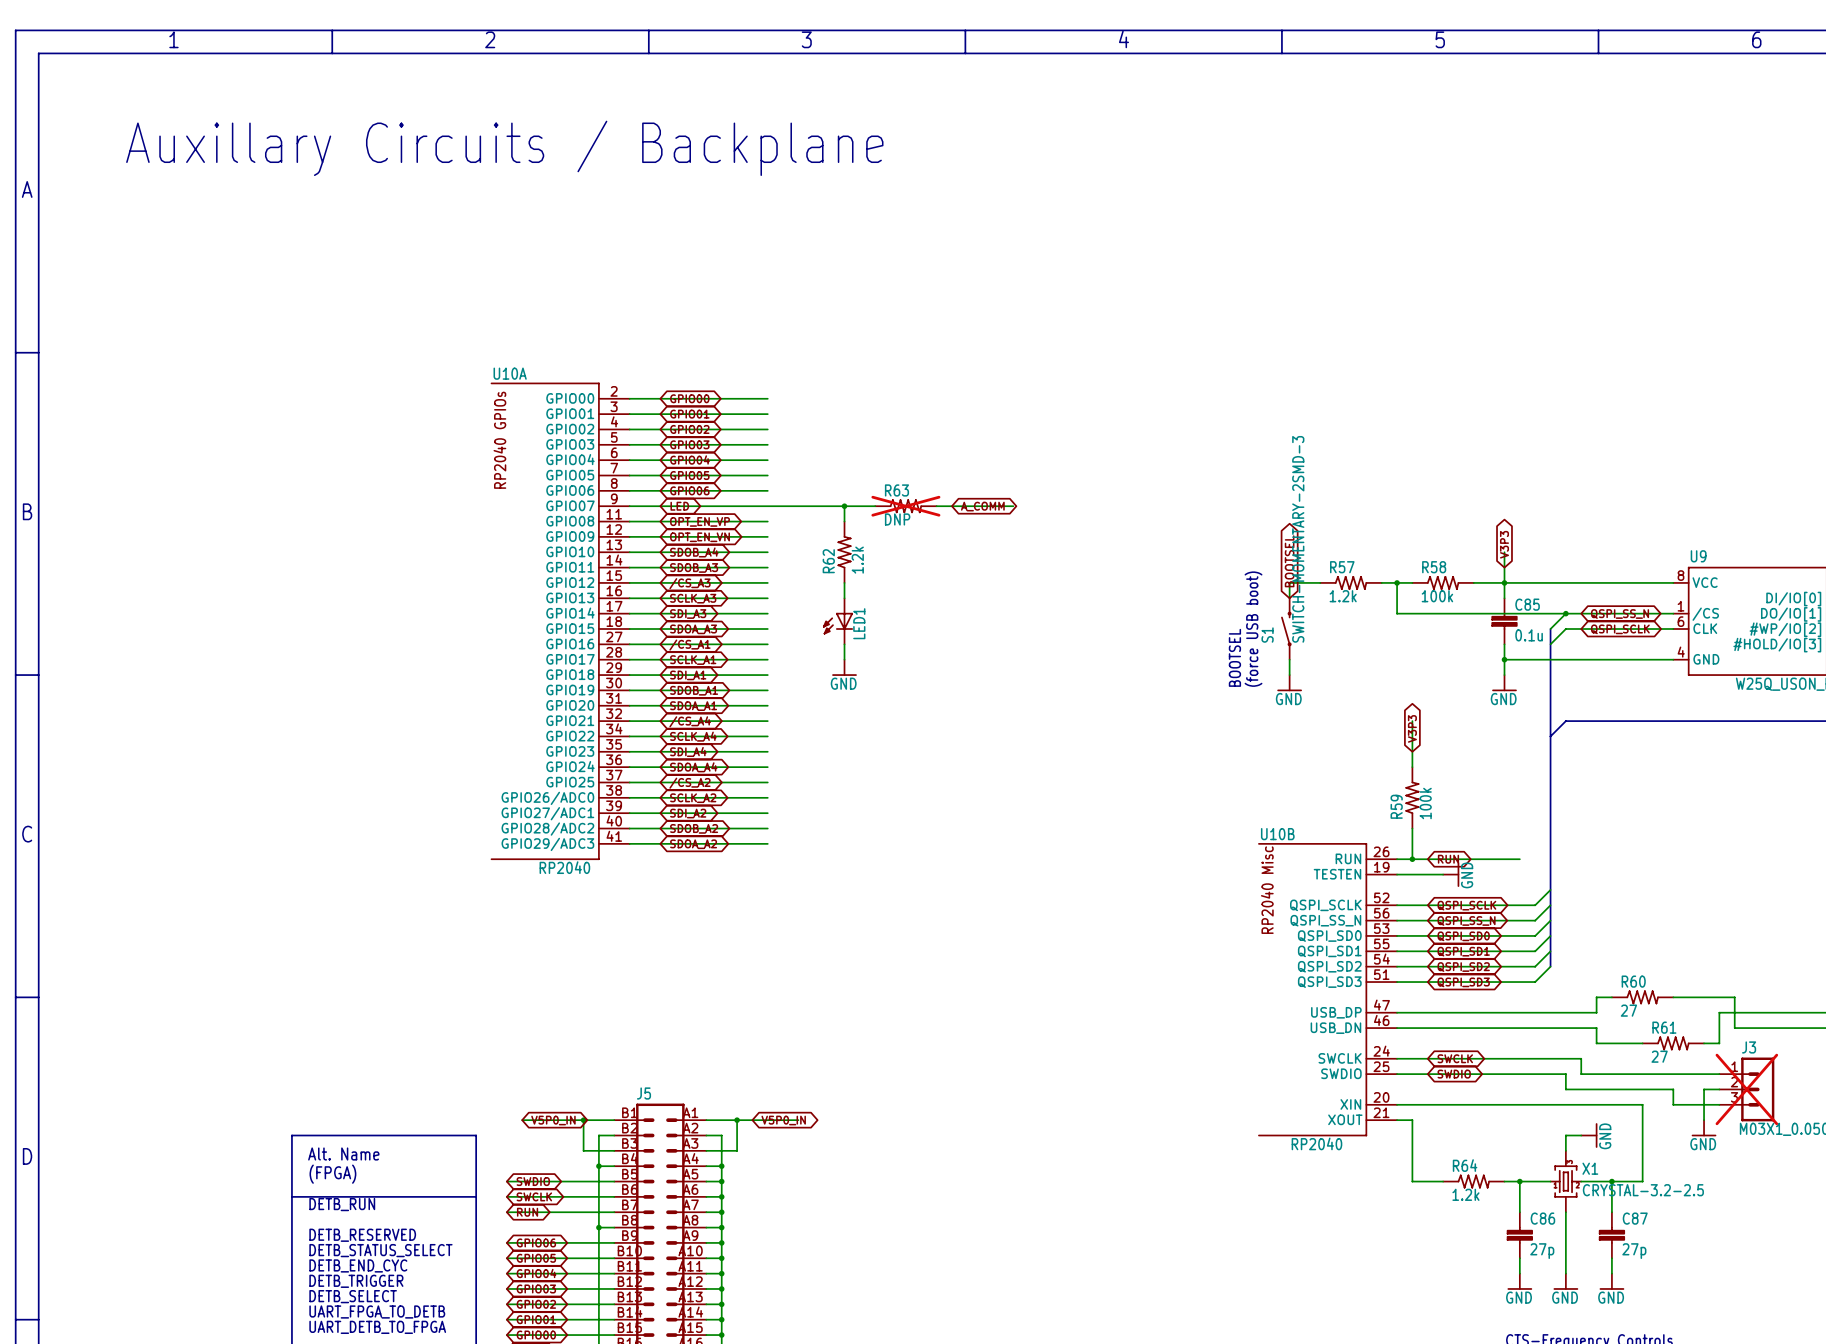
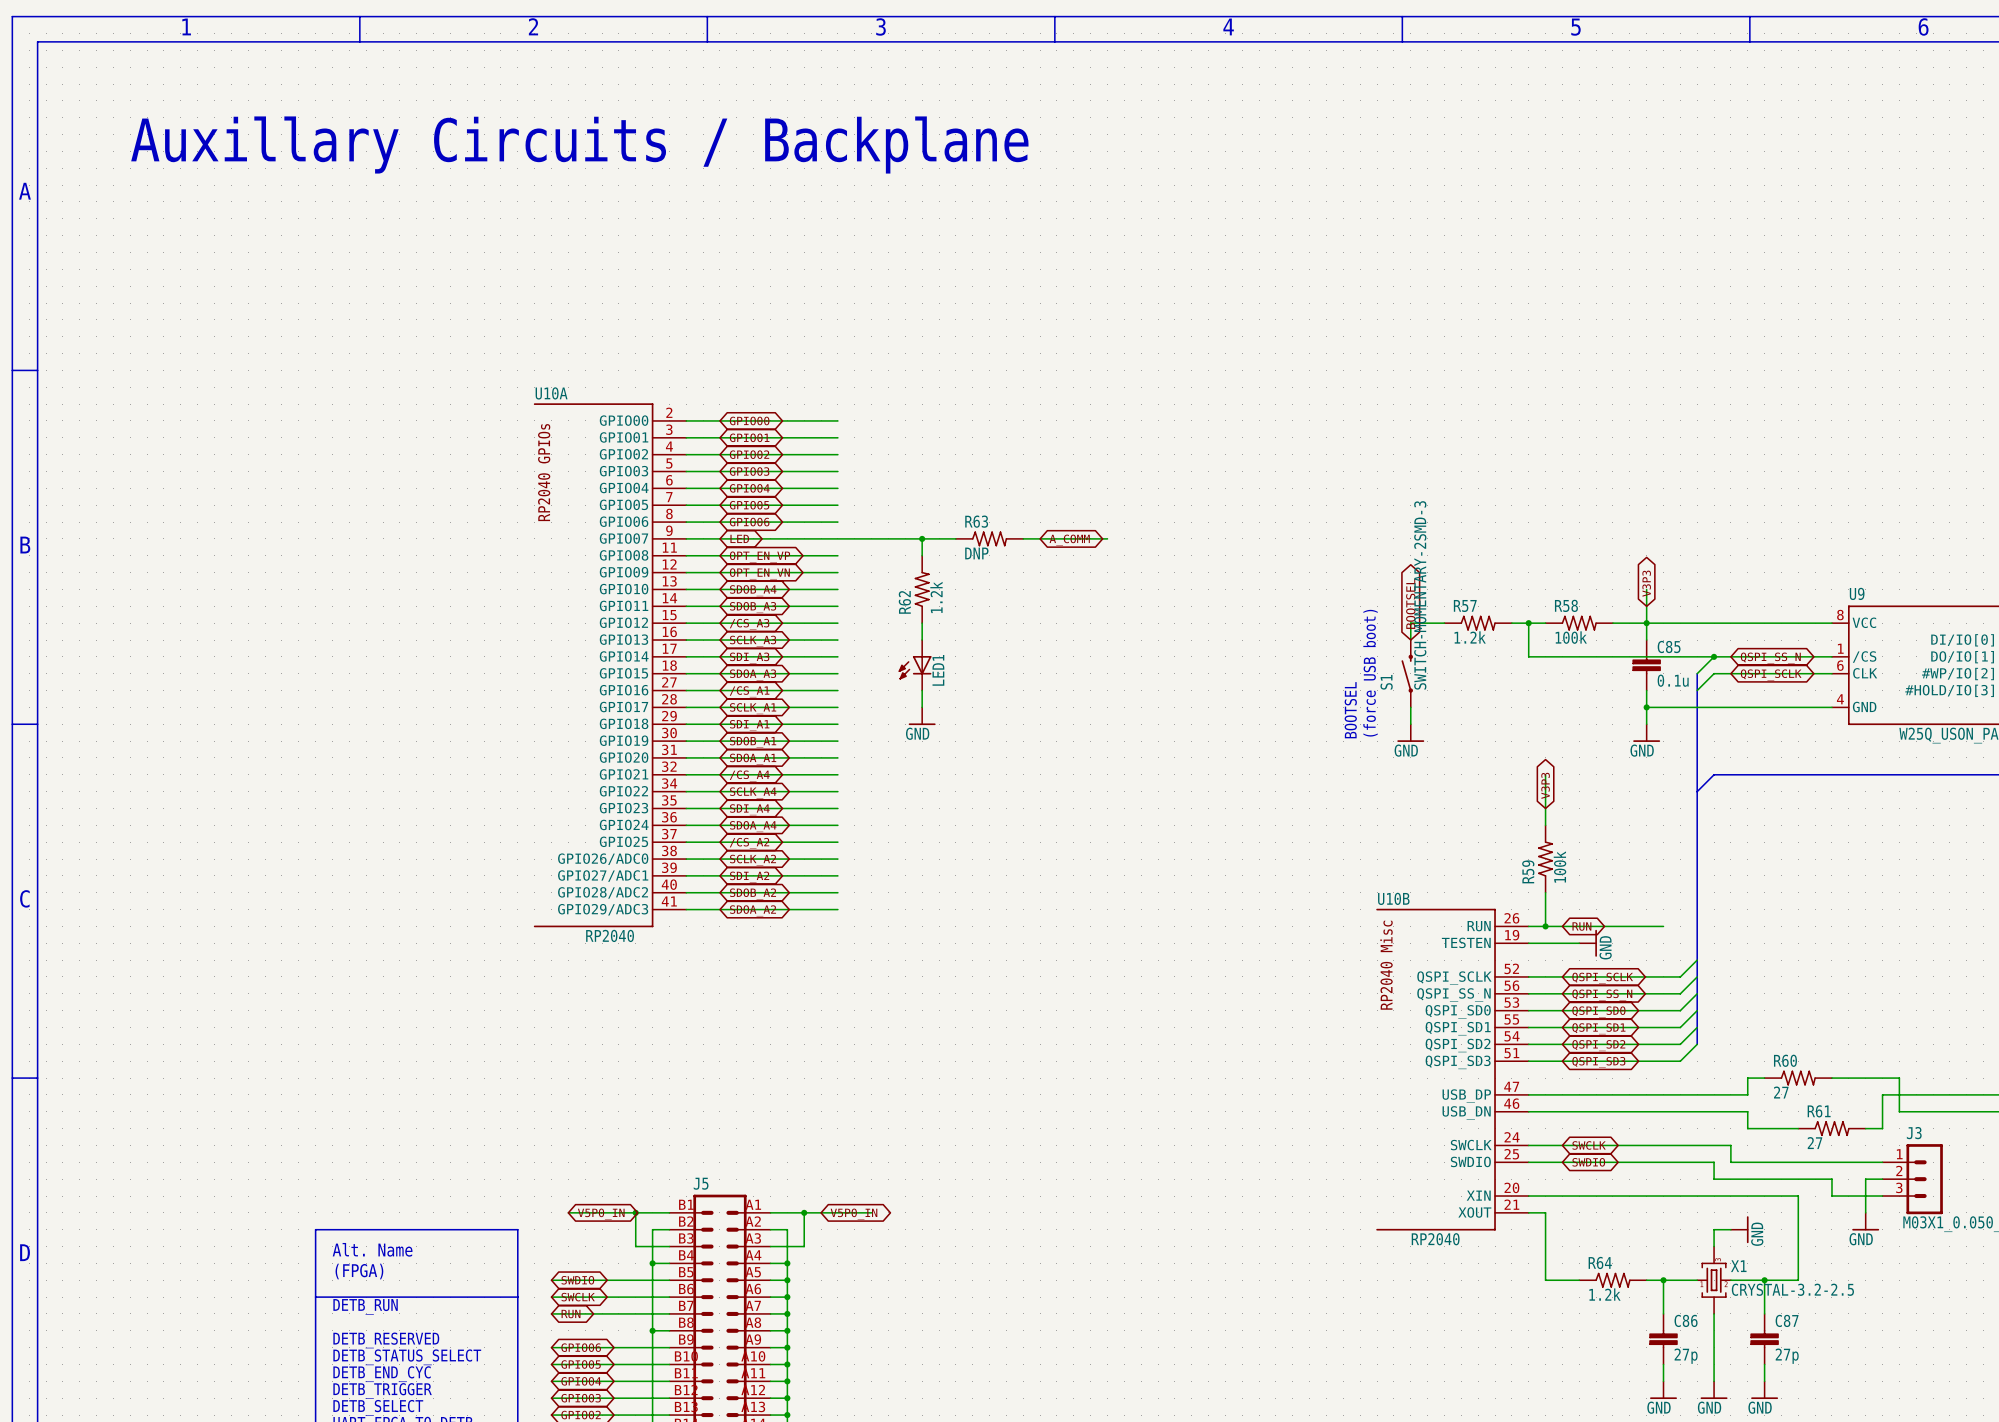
R63 do-not-place cross: (905, 506) -> none
J3 do-not-place cross: (1746, 1089) -> none

